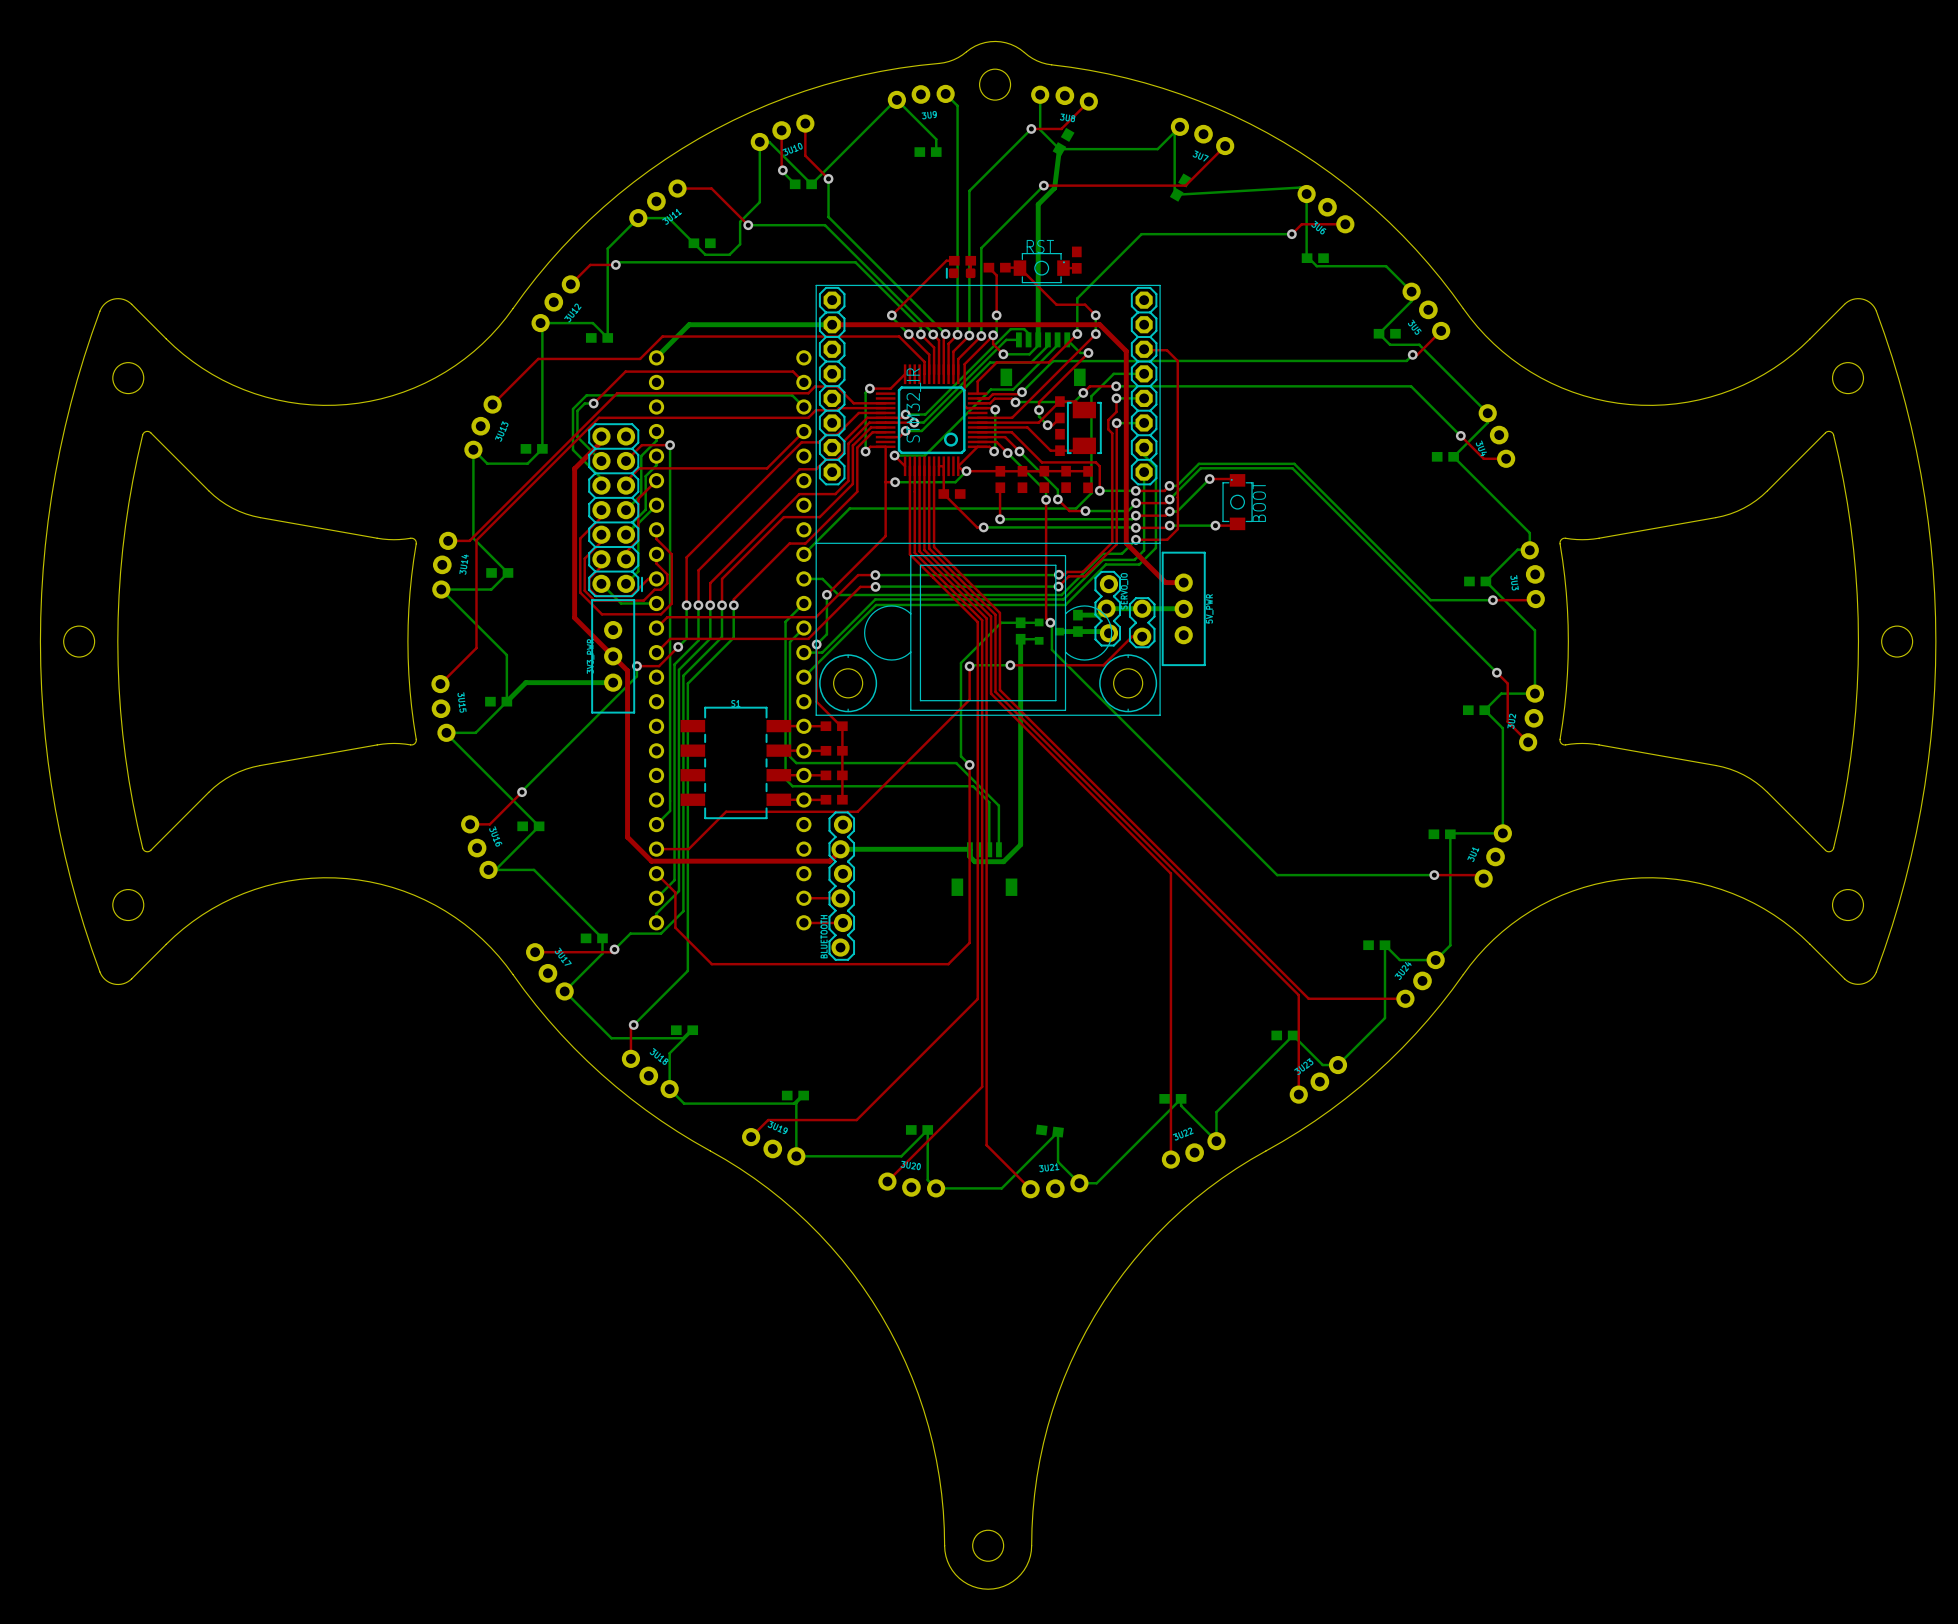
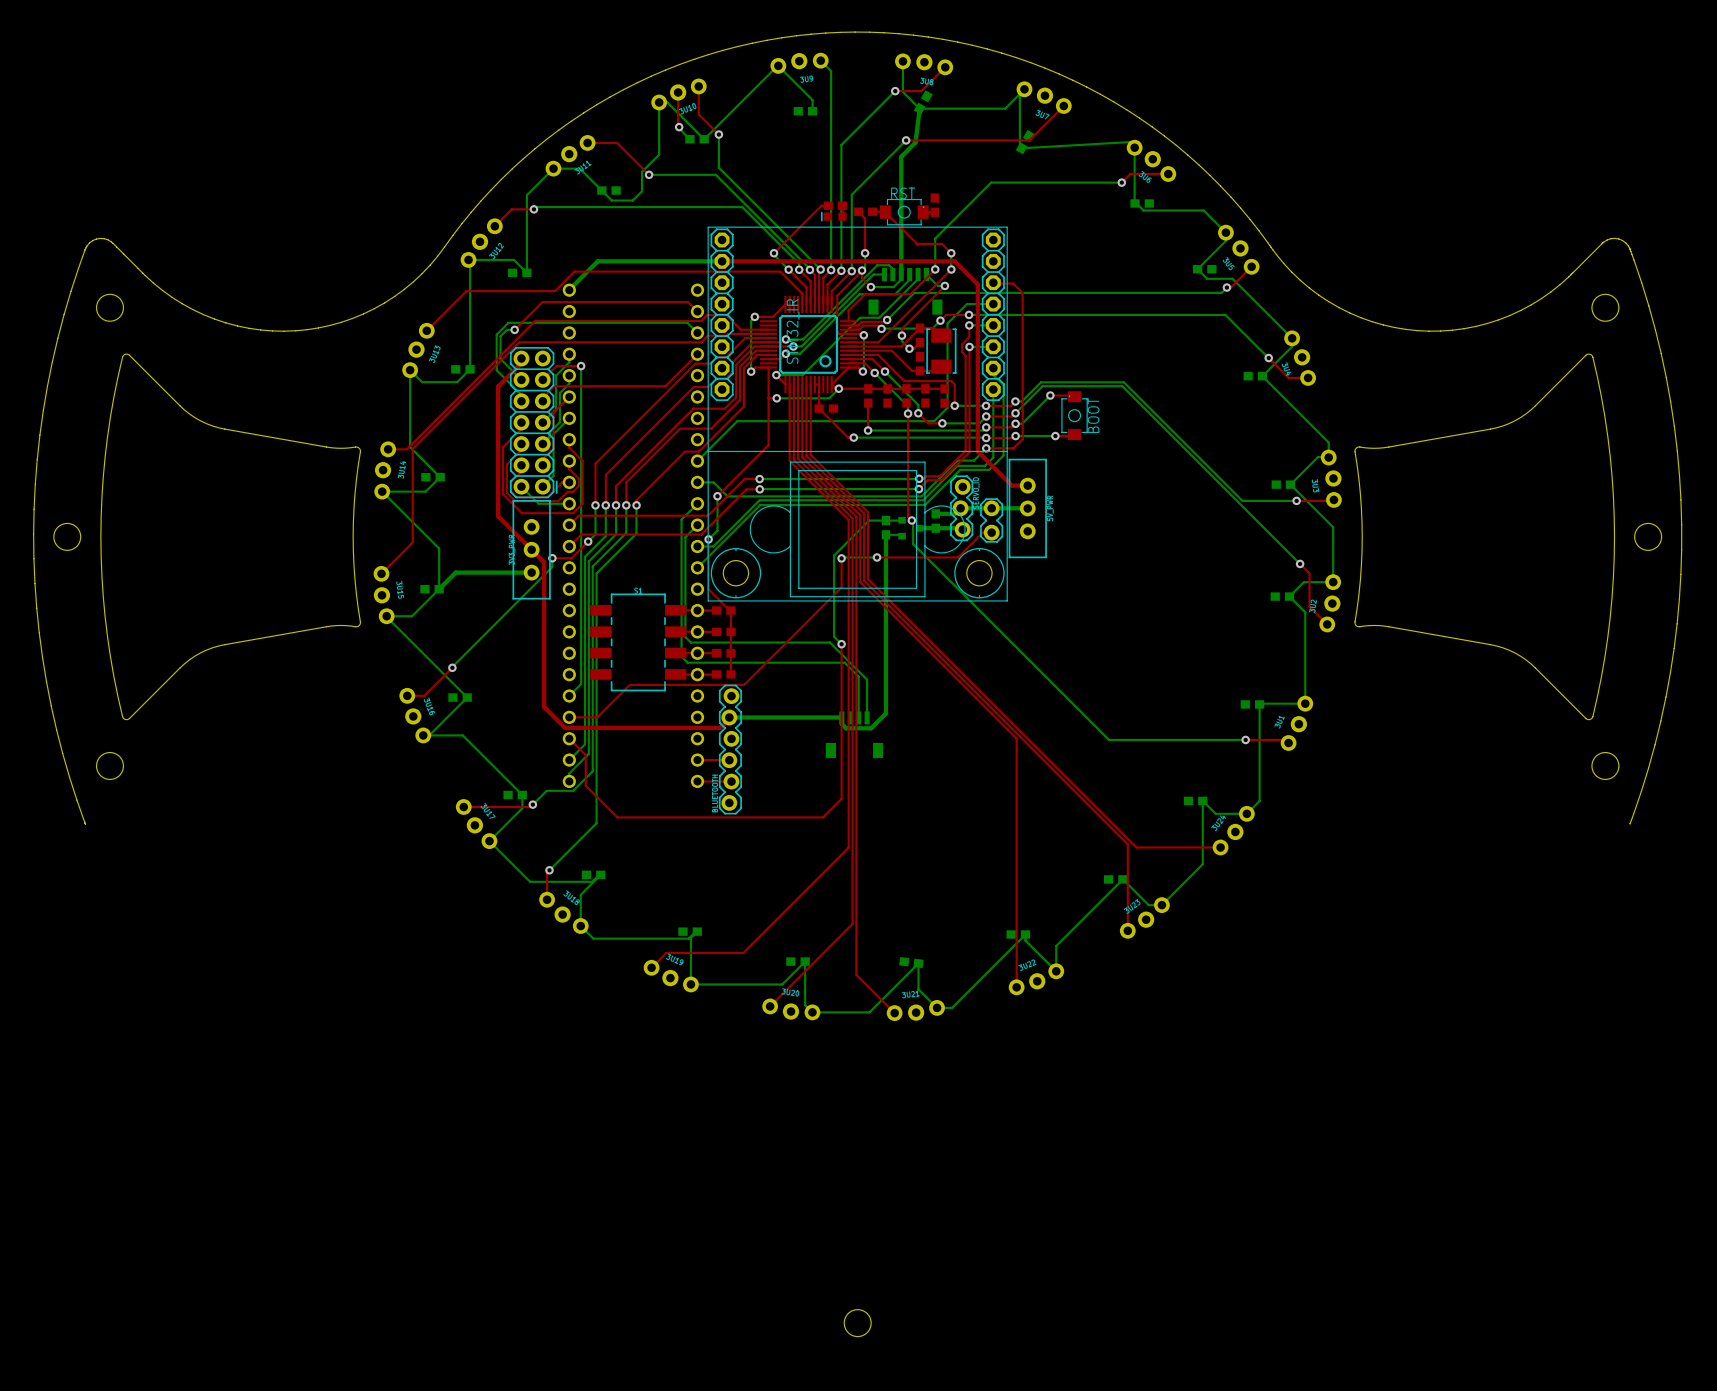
round board edge: [979, 69, 1011, 101] -> none
board edge: none -> (85, 823) (62, 753) (46, 681) (36, 608) (33, 533) (37, 459) (47, 386) (64, 314) (82, 256) (89, 243) (100, 238) (108, 239) (162, 290) (192, 309) (214, 319) (237, 325) (272, 330) (307, 329) (329, 325) (374, 308) (404, 289) (430, 265) (471, 212) (512, 168) (558, 130) (610, 96) (665, 70) (722, 50) (781, 37) (855, 32) (928, 37) (987, 48) (1044, 68) (1100, 94) (1152, 126) (1199, 165) (1240, 208) (1283, 263) (1309, 287) (1339, 307) (1383, 324) (1406, 329) (1440, 331) (1475, 326) (1498, 319) (1520, 310) (1551, 291) (1607, 240) (1615, 238) (1625, 242) (1631, 254) (1648, 306) (1666, 377) (1677, 450) (1681, 524) (1679, 599) (1670, 672) (1655, 744) (1630, 823)
board edge: (944, 1545) (939, 1477) (923, 1410) (905, 1361) (890, 1331) (852, 1273) (819, 1234) (767, 1188) (739, 1168) (661, 1121) (601, 1074) (548, 1019) (490, 947) (455, 917) (414, 895) (381, 884) (335, 877) (288, 881) (243, 893) (202, 914) (174, 936) (125, 982) (113, 984) (102, 976) (77, 903) (55, 809) (43, 713) (40, 641) (43, 569) (55, 473) (77, 379) (102, 306) (113, 299) (127, 301) (174, 346) (192, 361) (232, 385) (265, 397) (300, 403) (335, 405) (358, 403) (392, 395) (435, 377) (473, 351) (498, 326) (548, 262) (589, 220) (649, 170) (698, 138) (750, 112) (805, 90) (880, 71) (948, 61) (975, 46) (995, 41) (1015, 46) (1041, 62) (1107, 73) (1180, 94) (1233, 115) (1283, 142) (1331, 173) (1389, 222) (1428, 263) (1477, 326) (1502, 351) (1540, 377) (1583, 395) (1618, 403) (1652, 405) (1687, 402) (1721, 393) (1753, 379) (1783, 361) (1801, 346) (1848, 301) (1857, 298) (1869, 301) (1876, 311) (1892, 356) (1916, 450) (1930, 545) (1935, 641) (1933, 713) (1920, 809) (1899, 903) (1874, 976) (1862, 983) (1848, 981) (1801, 936) (1773, 914) (1732, 893) (1687, 881) (1641, 877) (1606, 881) (1561, 895) (1530, 911) (1502, 931) (1485, 947) (1428, 1019) (1374, 1074) (1314, 1121) (1236, 1168) (1208, 1188) (1157, 1234) (1123, 1273) (1086, 1331) (1058, 1393) (1043, 1443) (1036, 1477) (1030, 1556) (1020, 1574) (1008, 1584) (998, 1587) (988, 1589) (972, 1586) (959, 1578) (952, 1570) (947, 1561) (944, 1545) -> none

